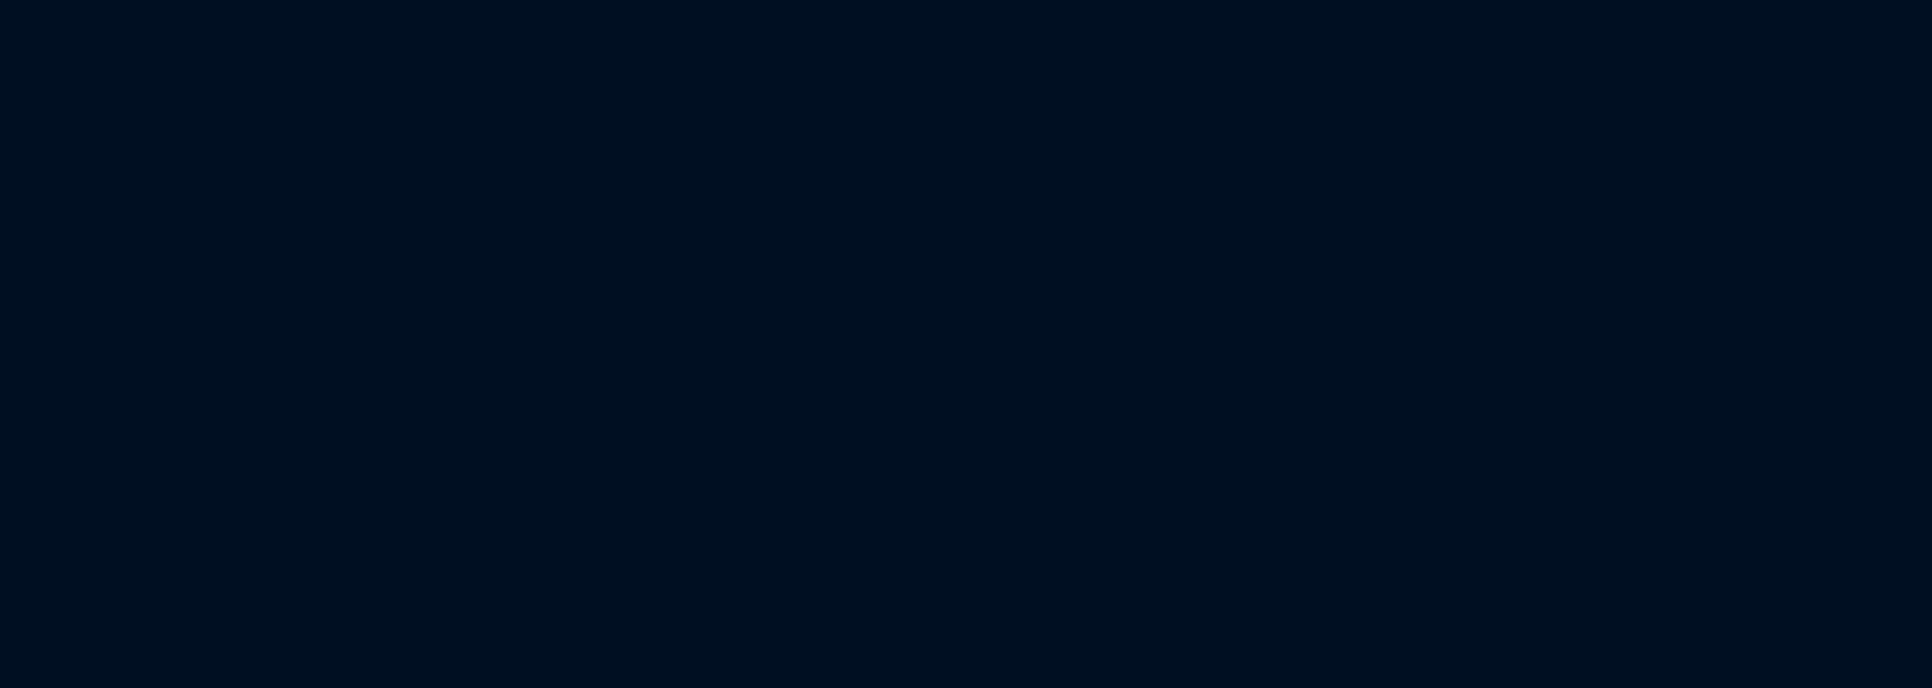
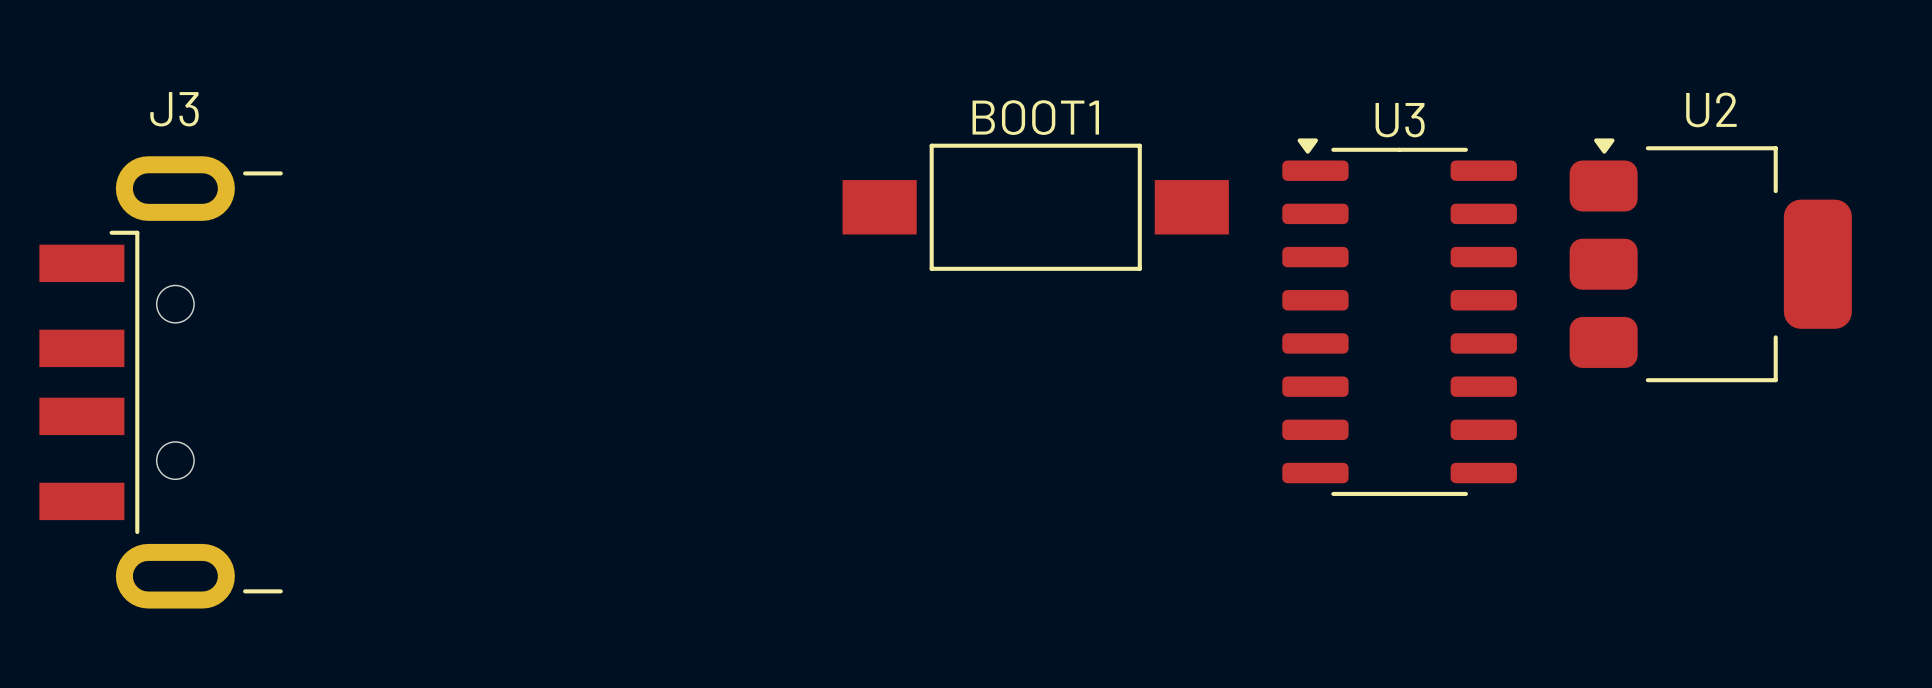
BOOT1: none -> (1035, 207)
U2: none -> (1710, 260)
U3: none -> (1399, 317)
J3: none -> (161, 382)

